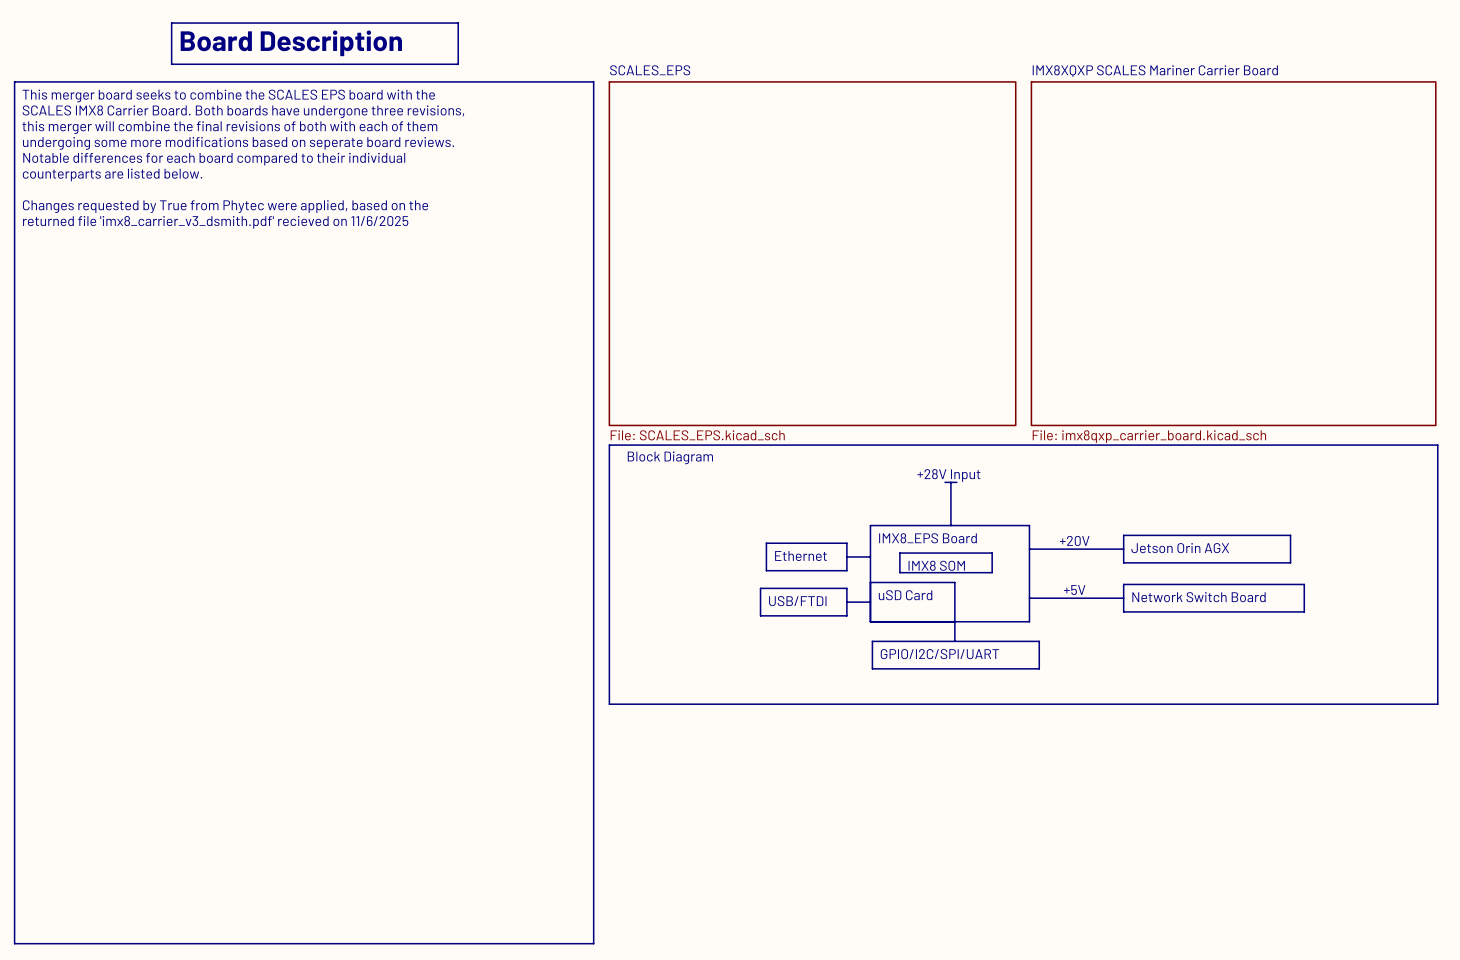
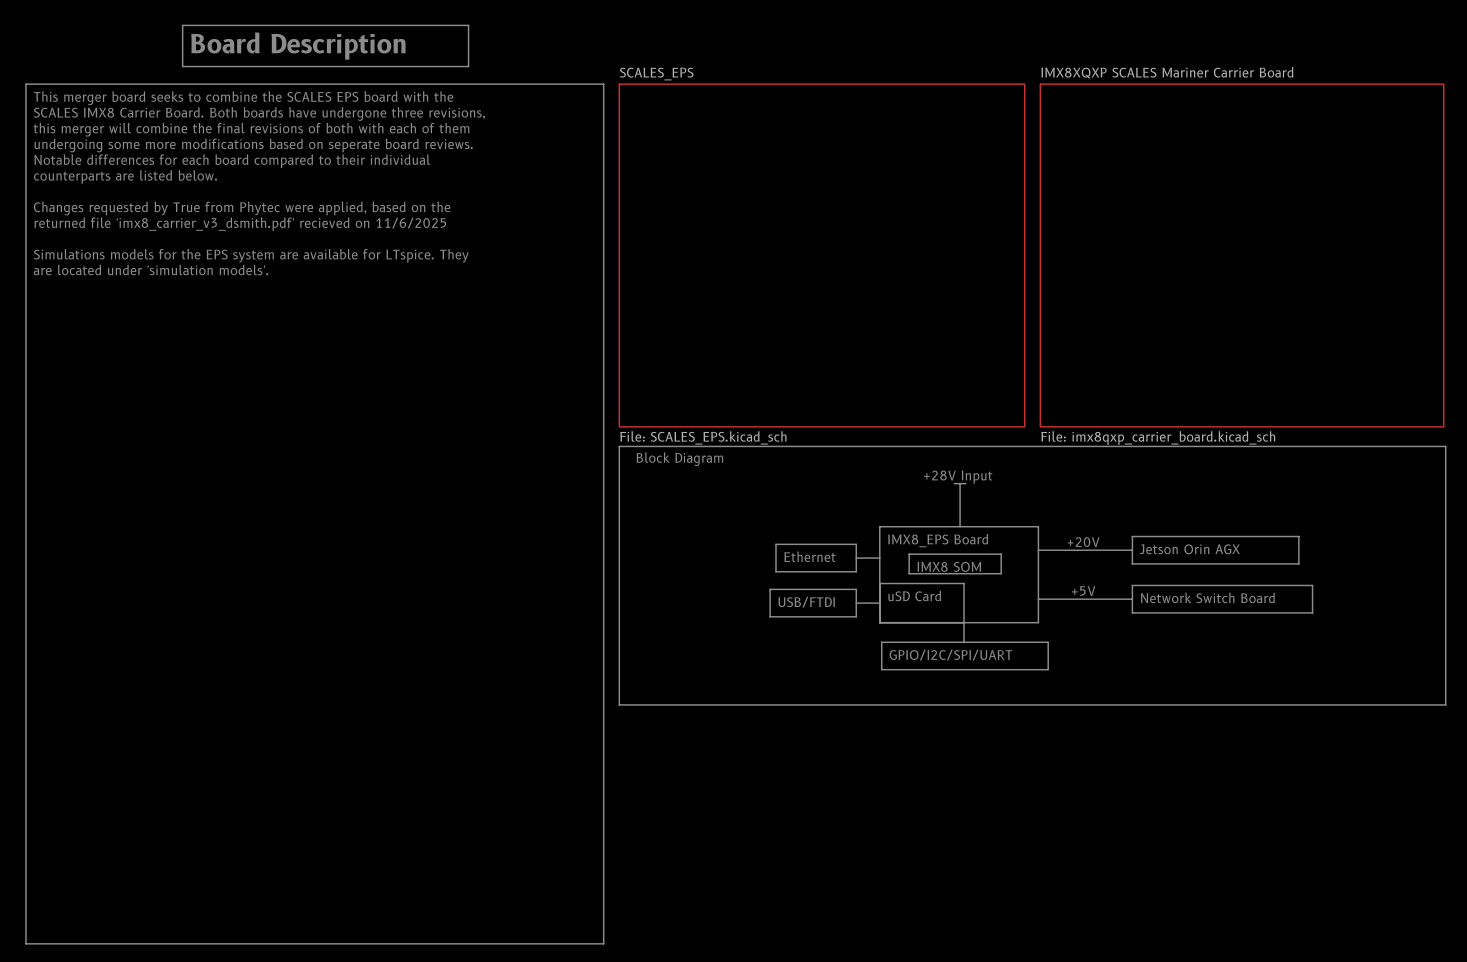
text: none -> Simulations models for the EPS system are available for LTspice. They (251, 255)
text: none -> are located under 'simulation models'. (150, 270)

